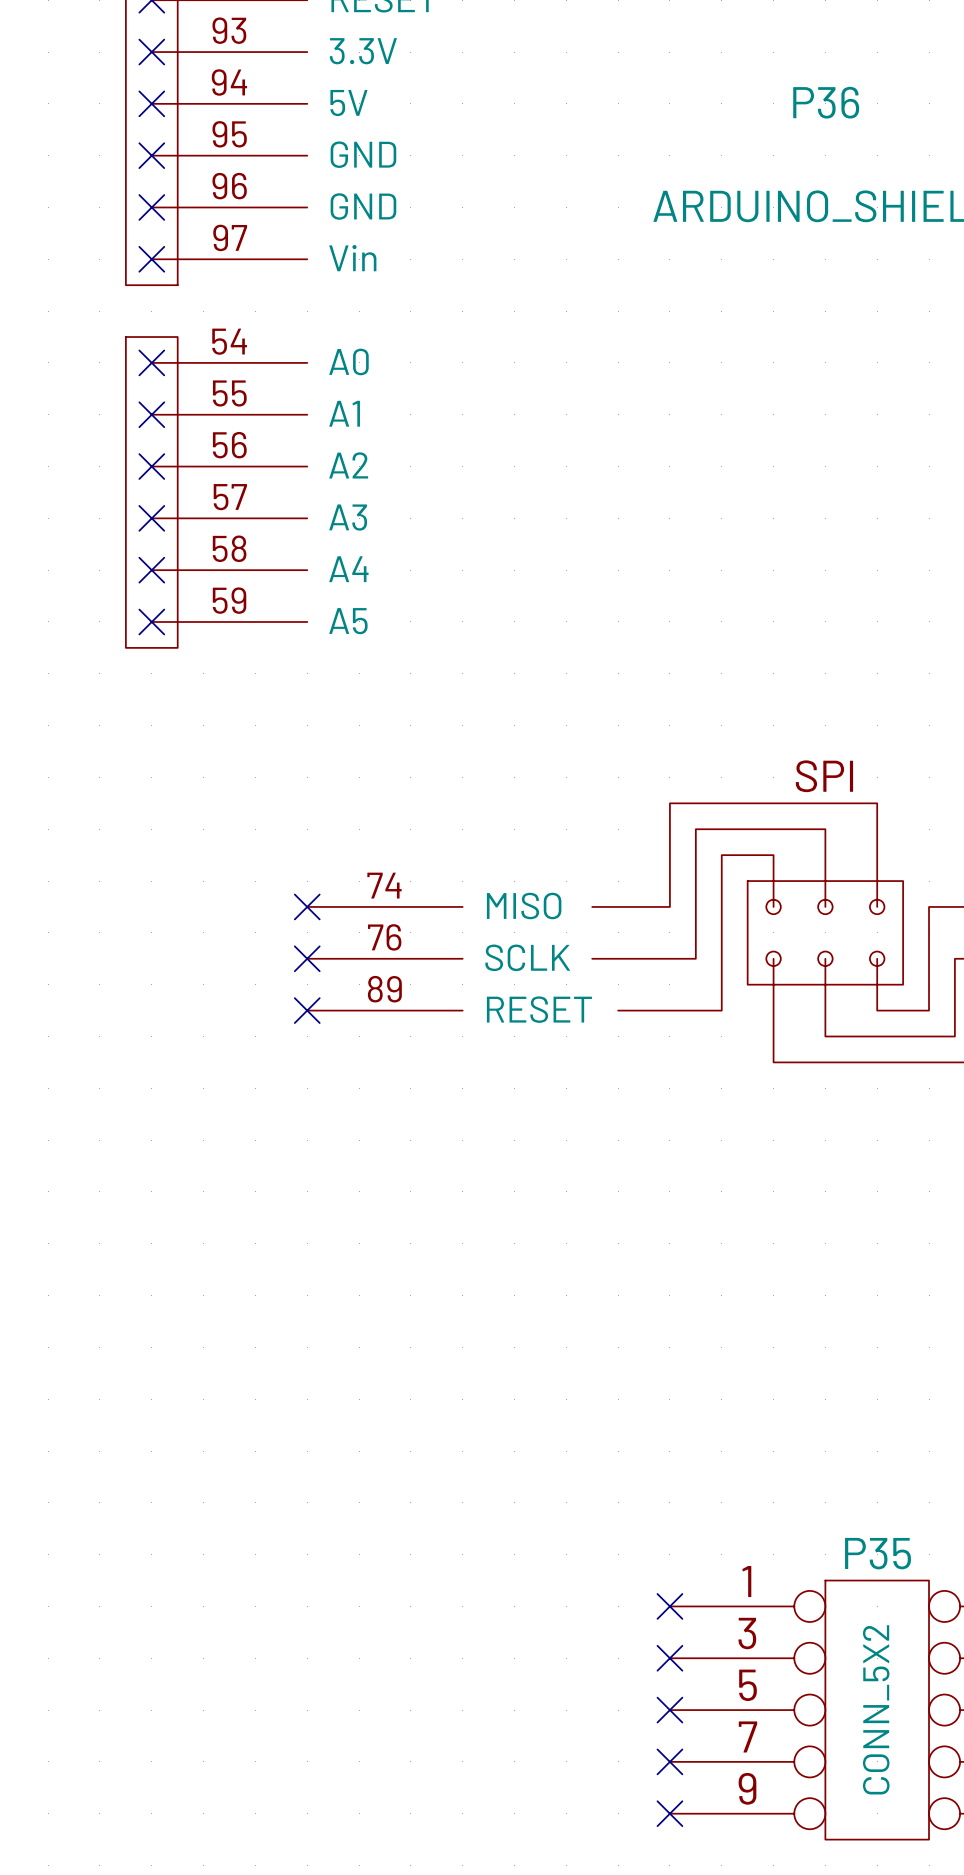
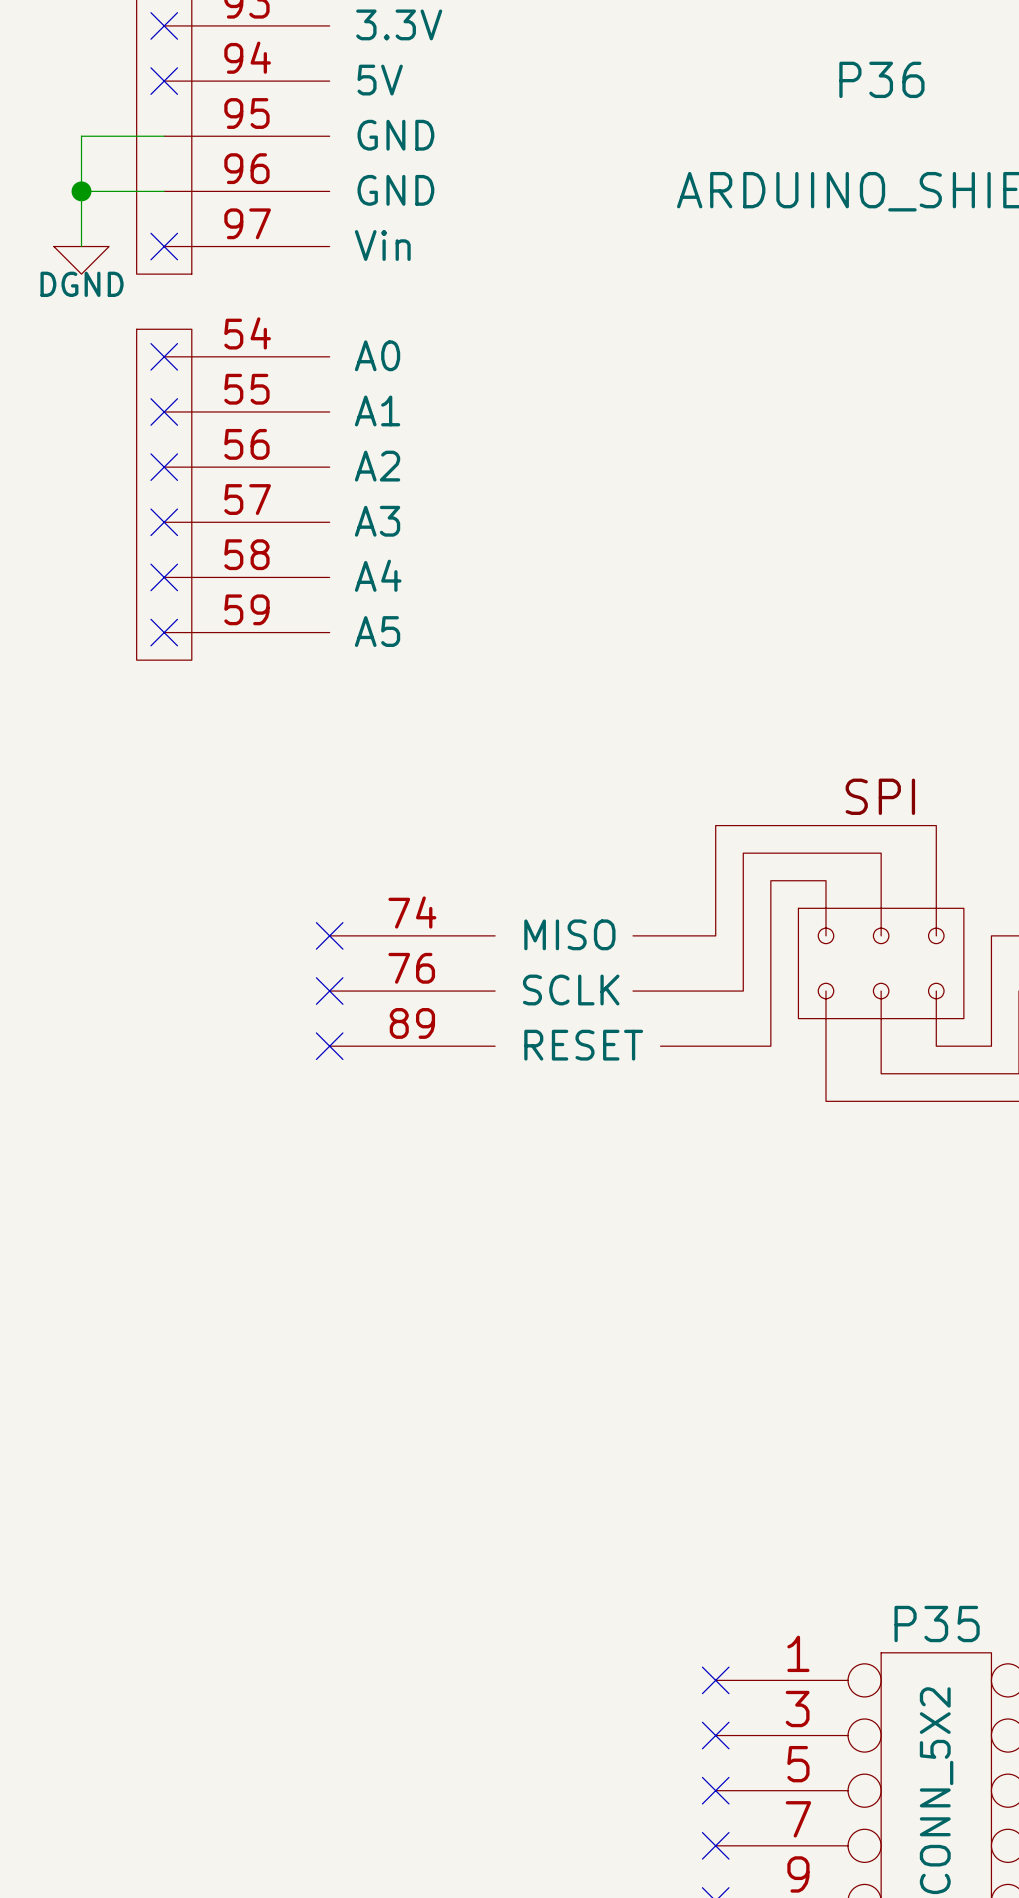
wire: none -> (164, 136) (81, 136) (81, 246)
no-connect mark: (151, 155) -> none
wire: none -> (81, 191) (164, 191)
junction: none -> (81, 191)
no-connect mark: (151, 207) -> none
power symbol: none -> DGND (81, 260)

